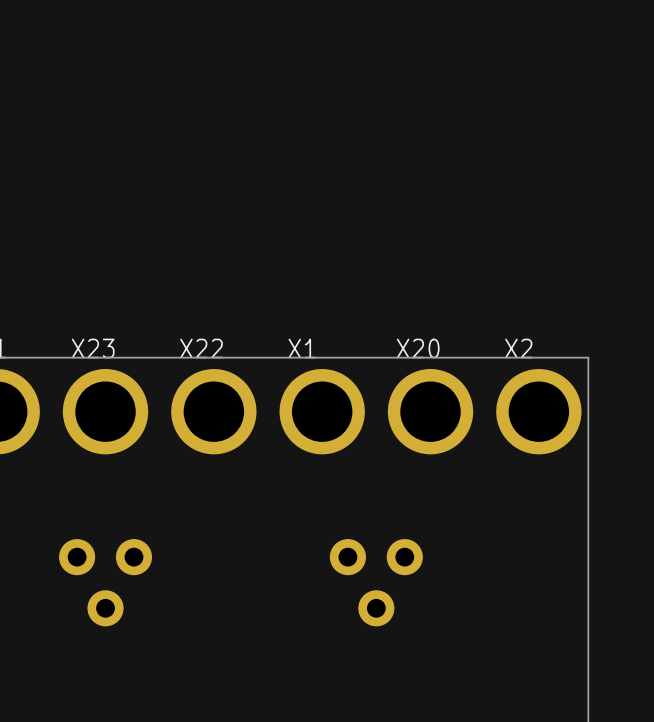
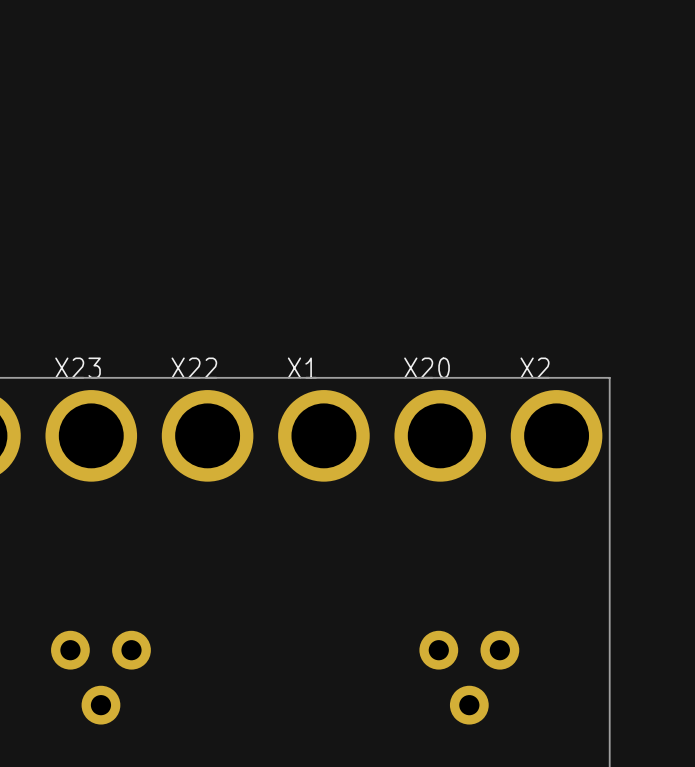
part position: (105, 582) -> (100, 677)
part position: (376, 582) -> (469, 677)

